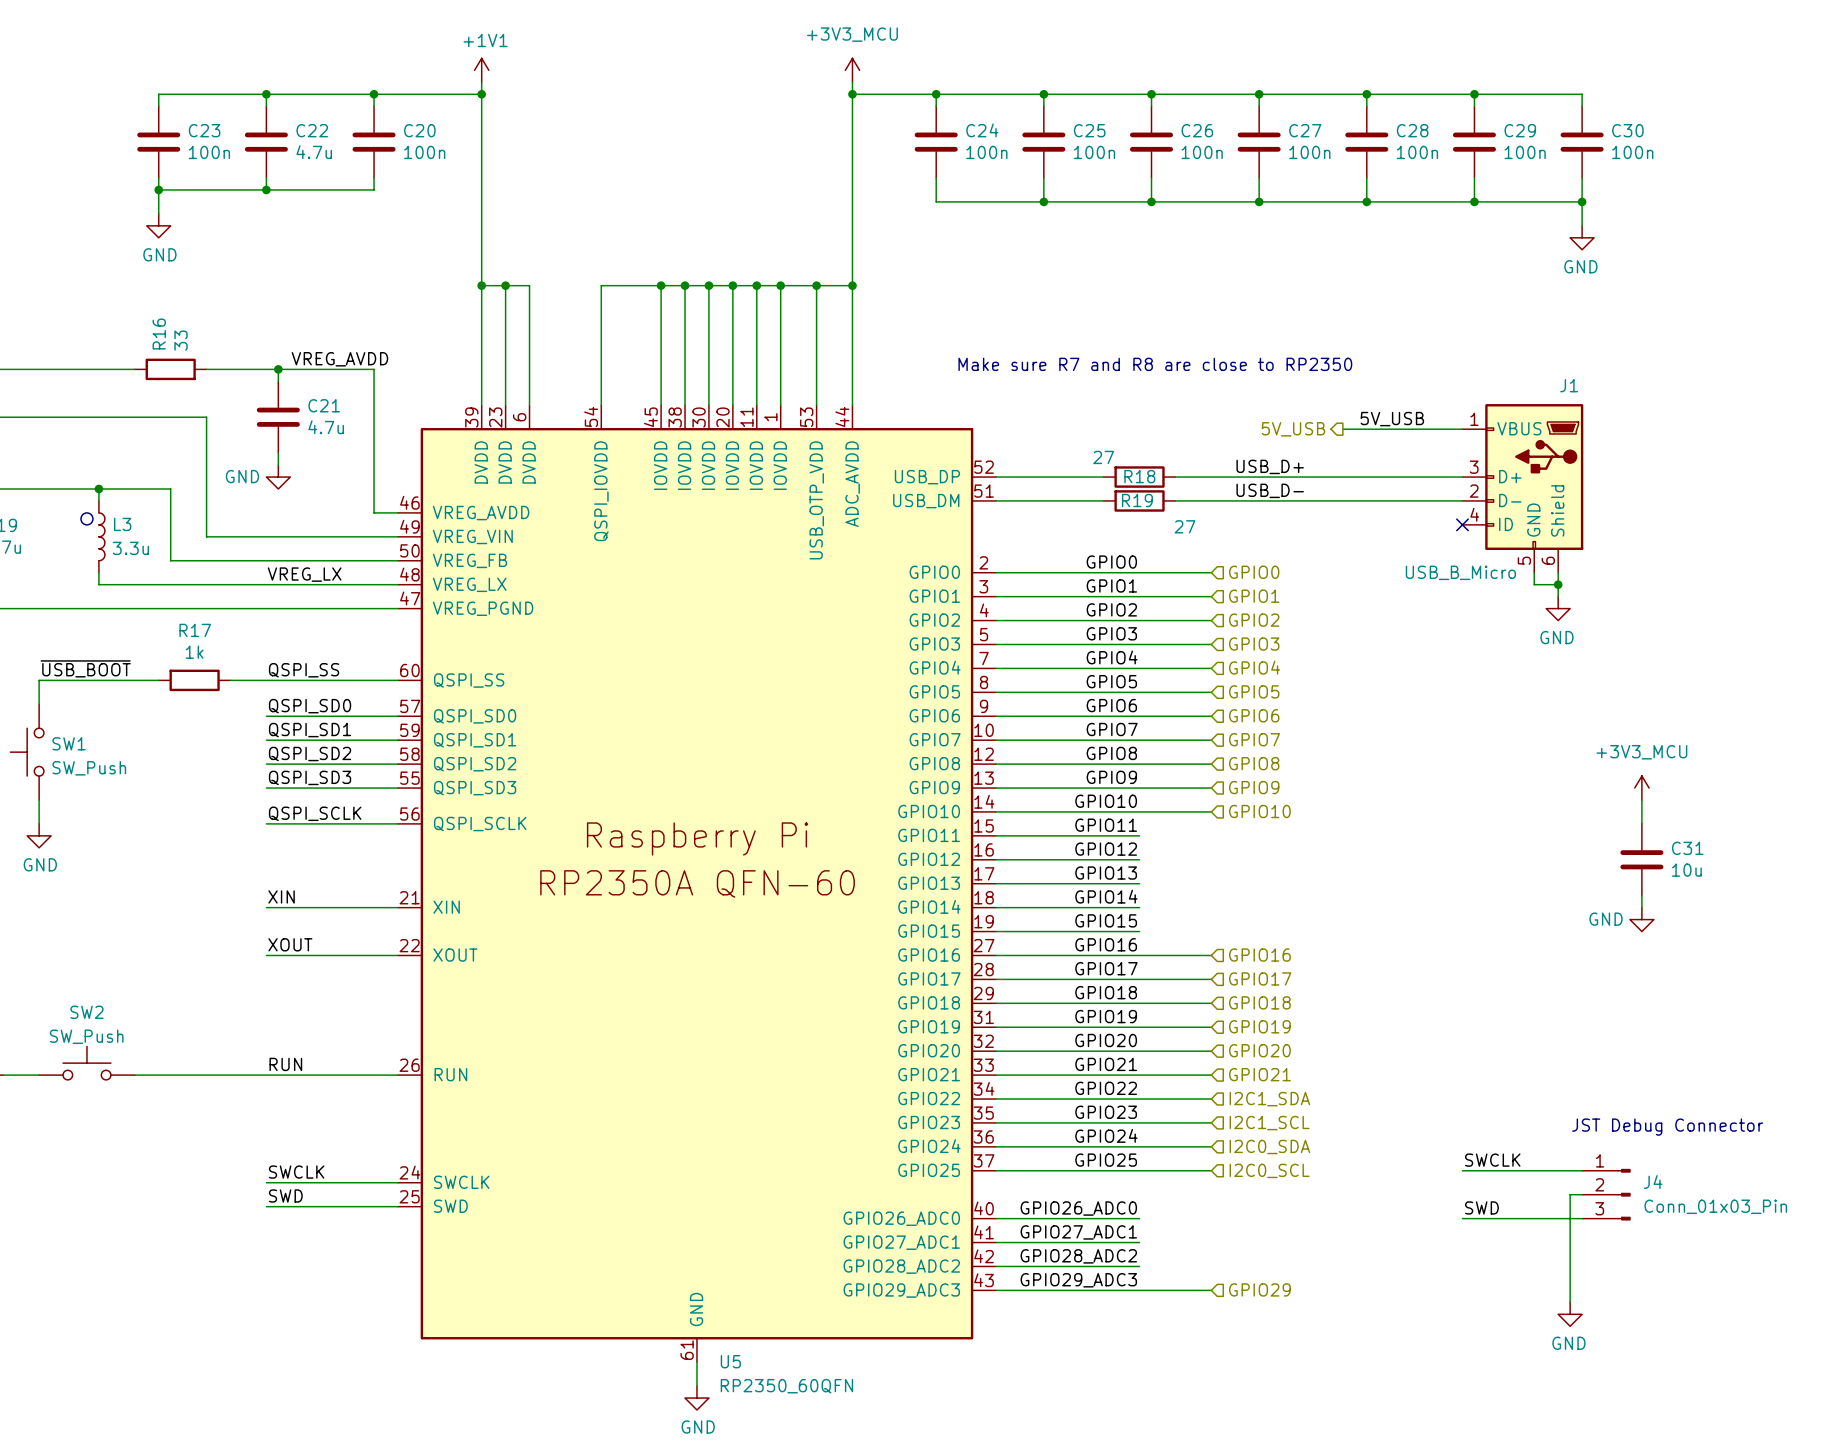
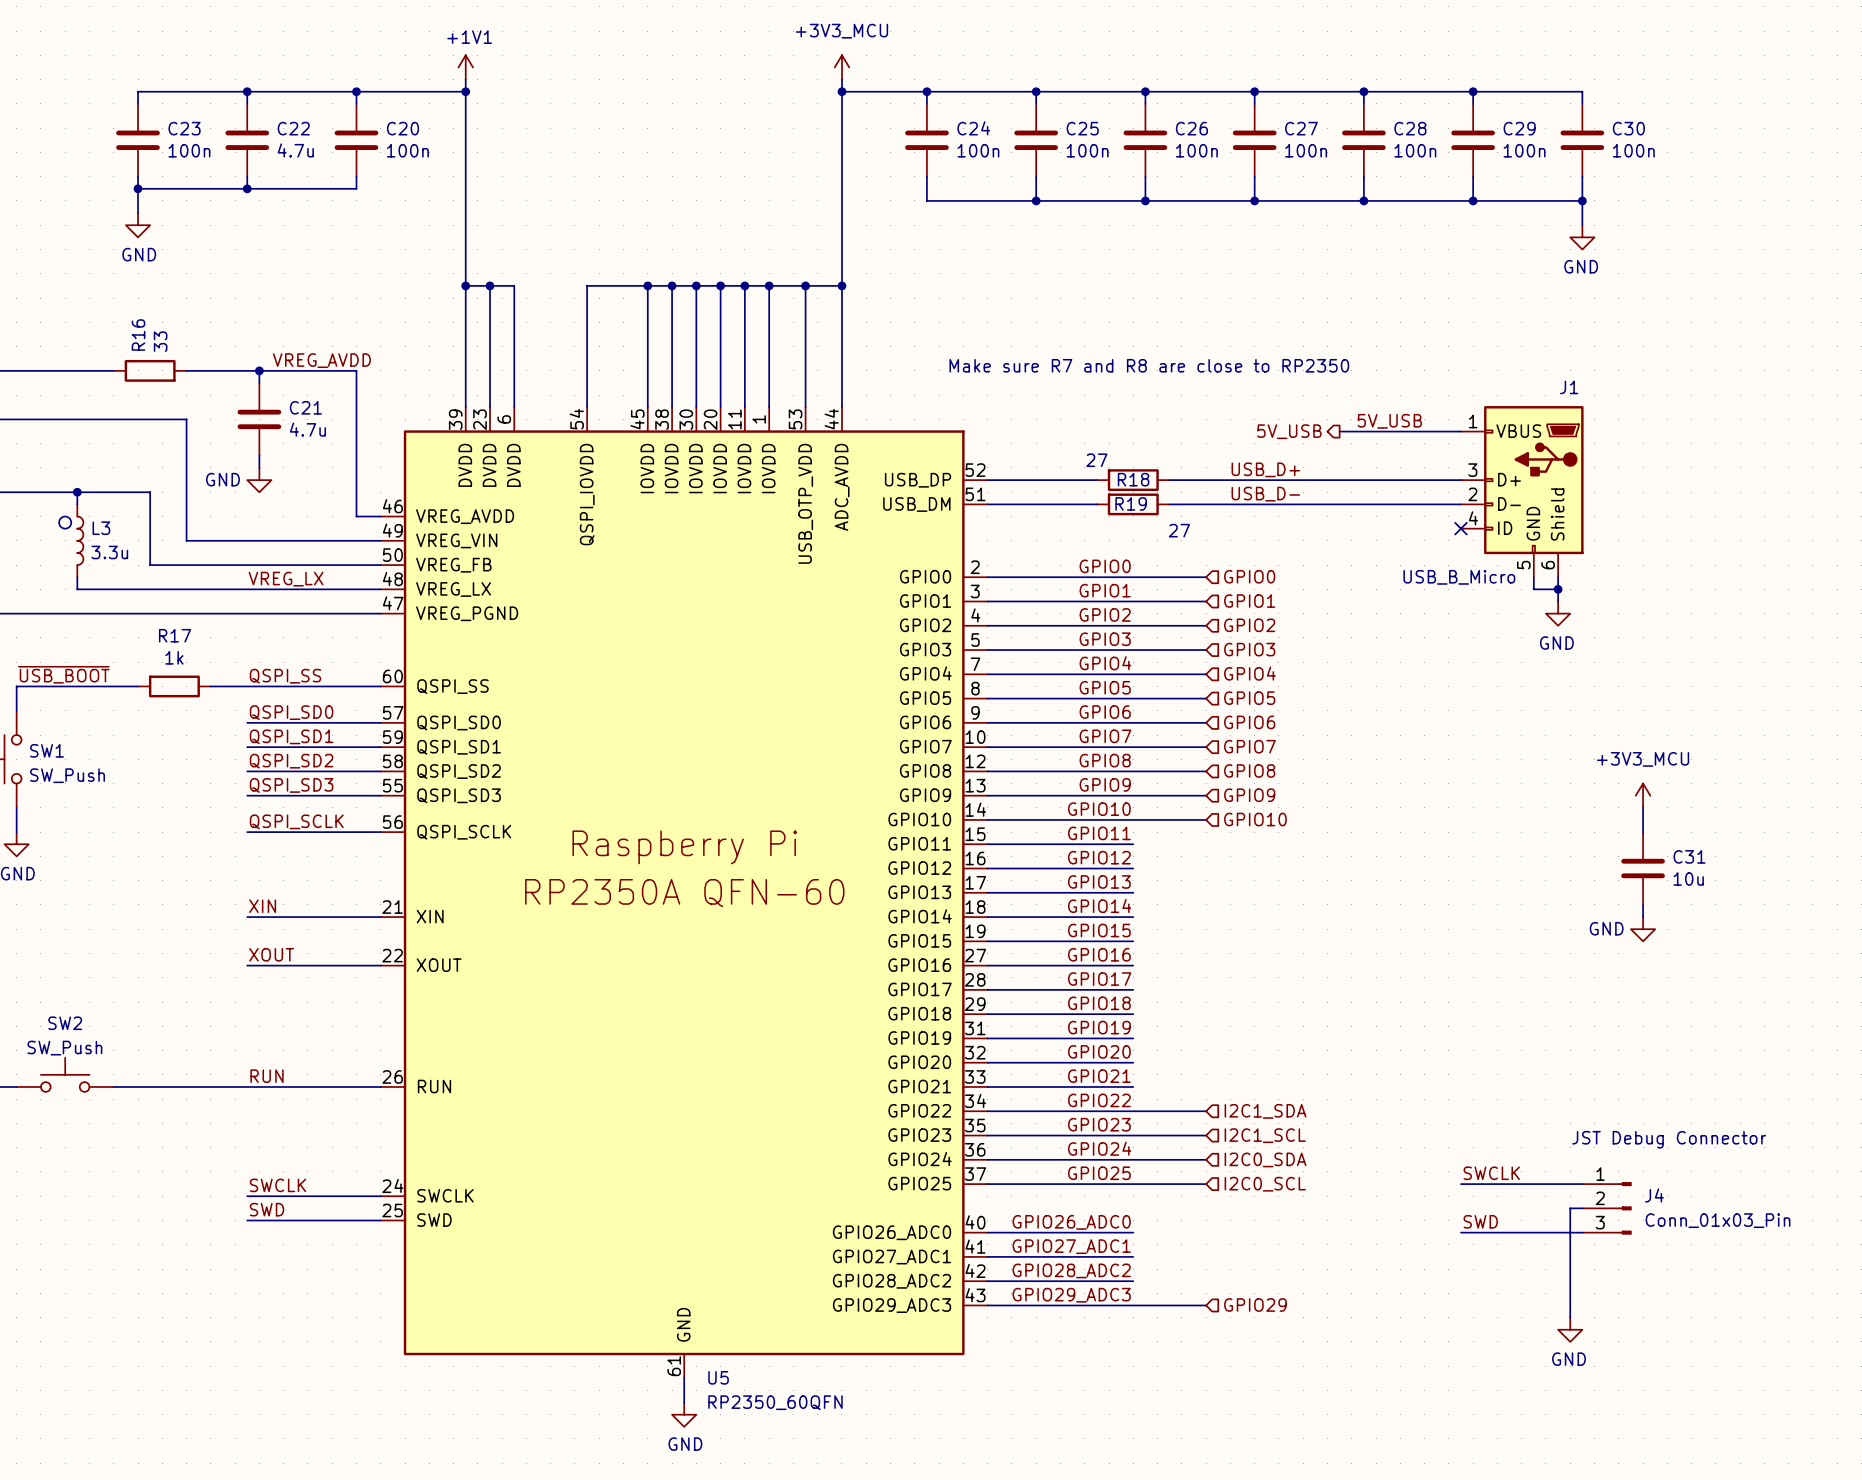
wire: (1139, 955) (1211, 955) -> none
hierarchical label: GPIO16 (1259, 955) -> none
hierarchical label: GPIO17 (1260, 978) -> none
wire: (1139, 979) (1211, 979) -> none
hierarchical label: GPIO18 (1259, 1002) -> none
wire: (1139, 1003) (1211, 1003) -> none
hierarchical label: GPIO19 (1259, 1026) -> none
wire: (1139, 1027) (1211, 1027) -> none
hierarchical label: GPIO20 (1259, 1050) -> none
wire: (1139, 1051) (1211, 1051) -> none
hierarchical label: GPIO21 (1259, 1074) -> none
wire: (1139, 1075) (1211, 1075) -> none

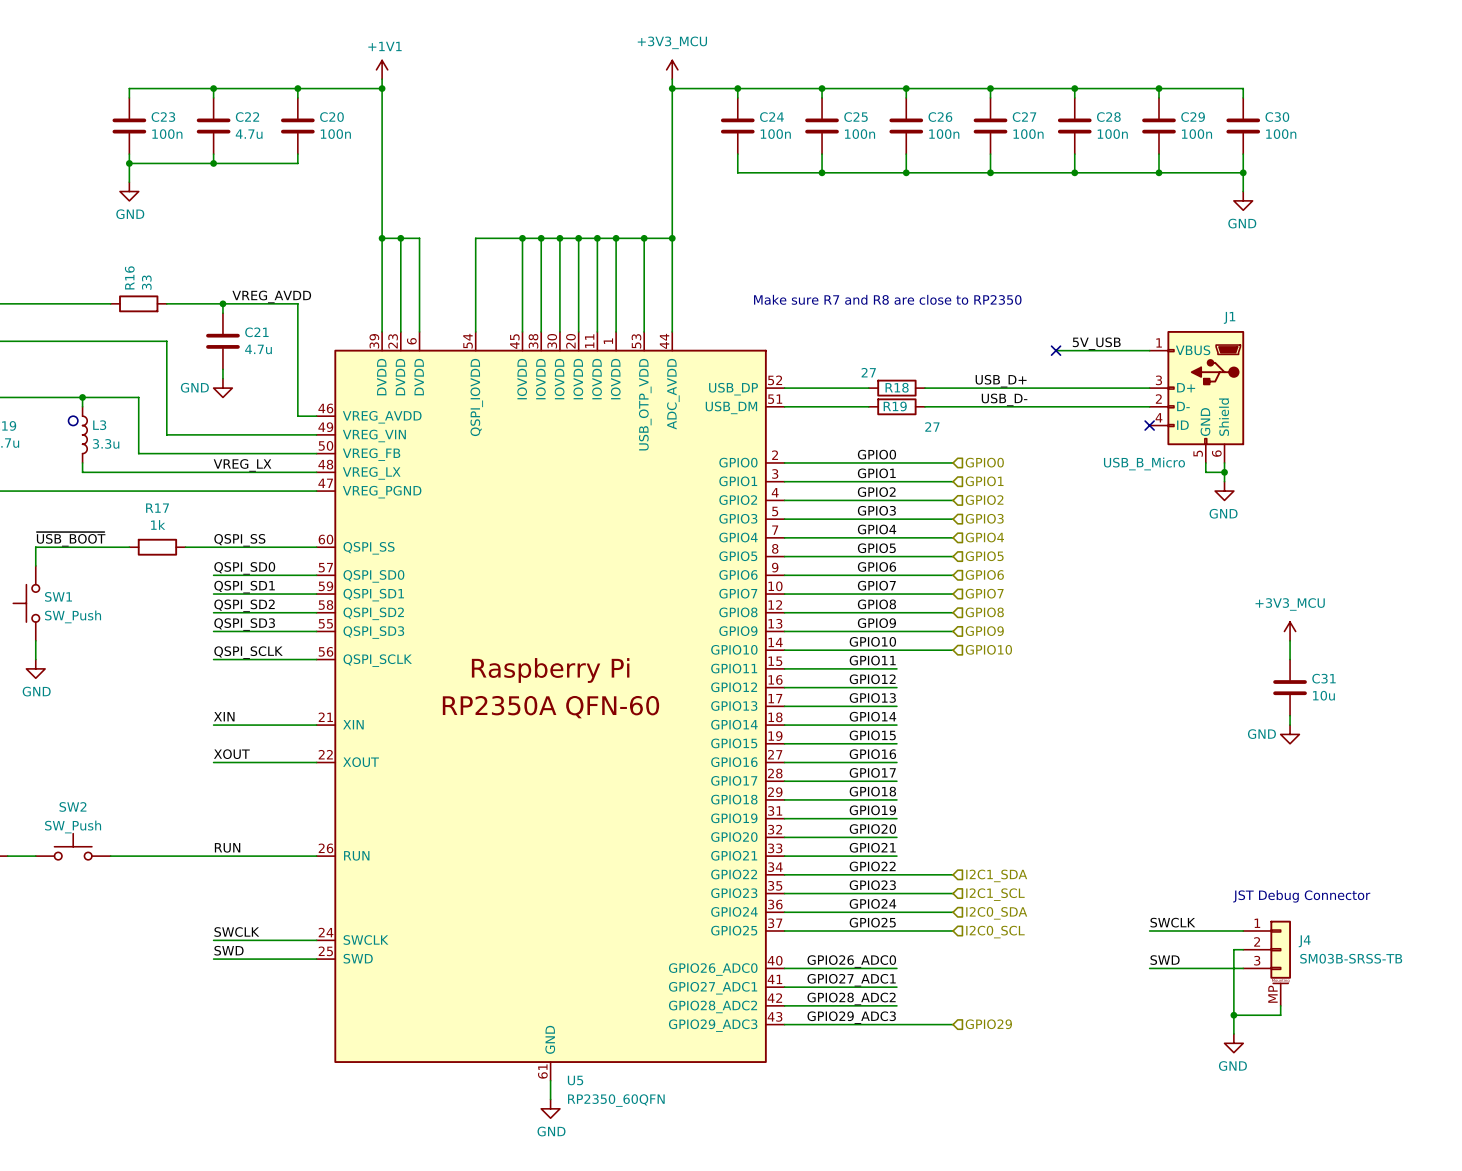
hierarchical label: 5V_USB (1289, 431) -> none
no-connect mark: none -> (1056, 350)
J4 symbol: [1582, 1182, 1632, 1235] -> [1243, 920, 1291, 1006]
J4 value: Conn_01x03_Pin (1718, 1220) -> SM03B-SRSS-TB (1351, 958)
wire: none -> (1280, 1005) (1280, 1015) (1233, 1015)
junction: none -> (1233, 1015)

